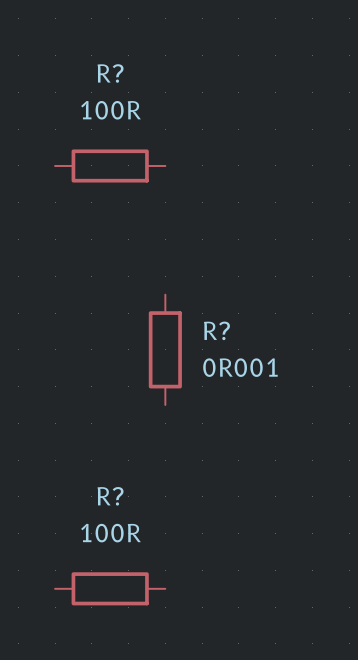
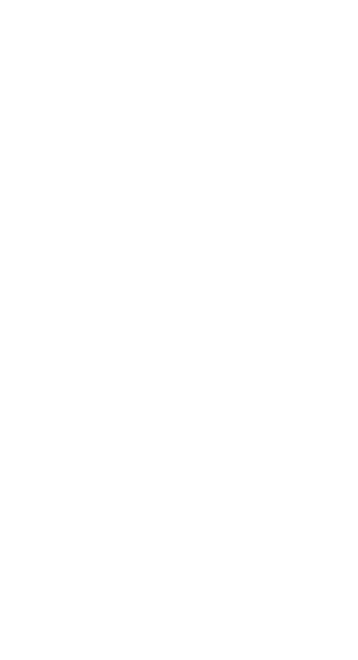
R?: 100R (110, 165) -> none
R?: 0R001 (165, 349) -> none
R?: 100R (110, 588) -> none

